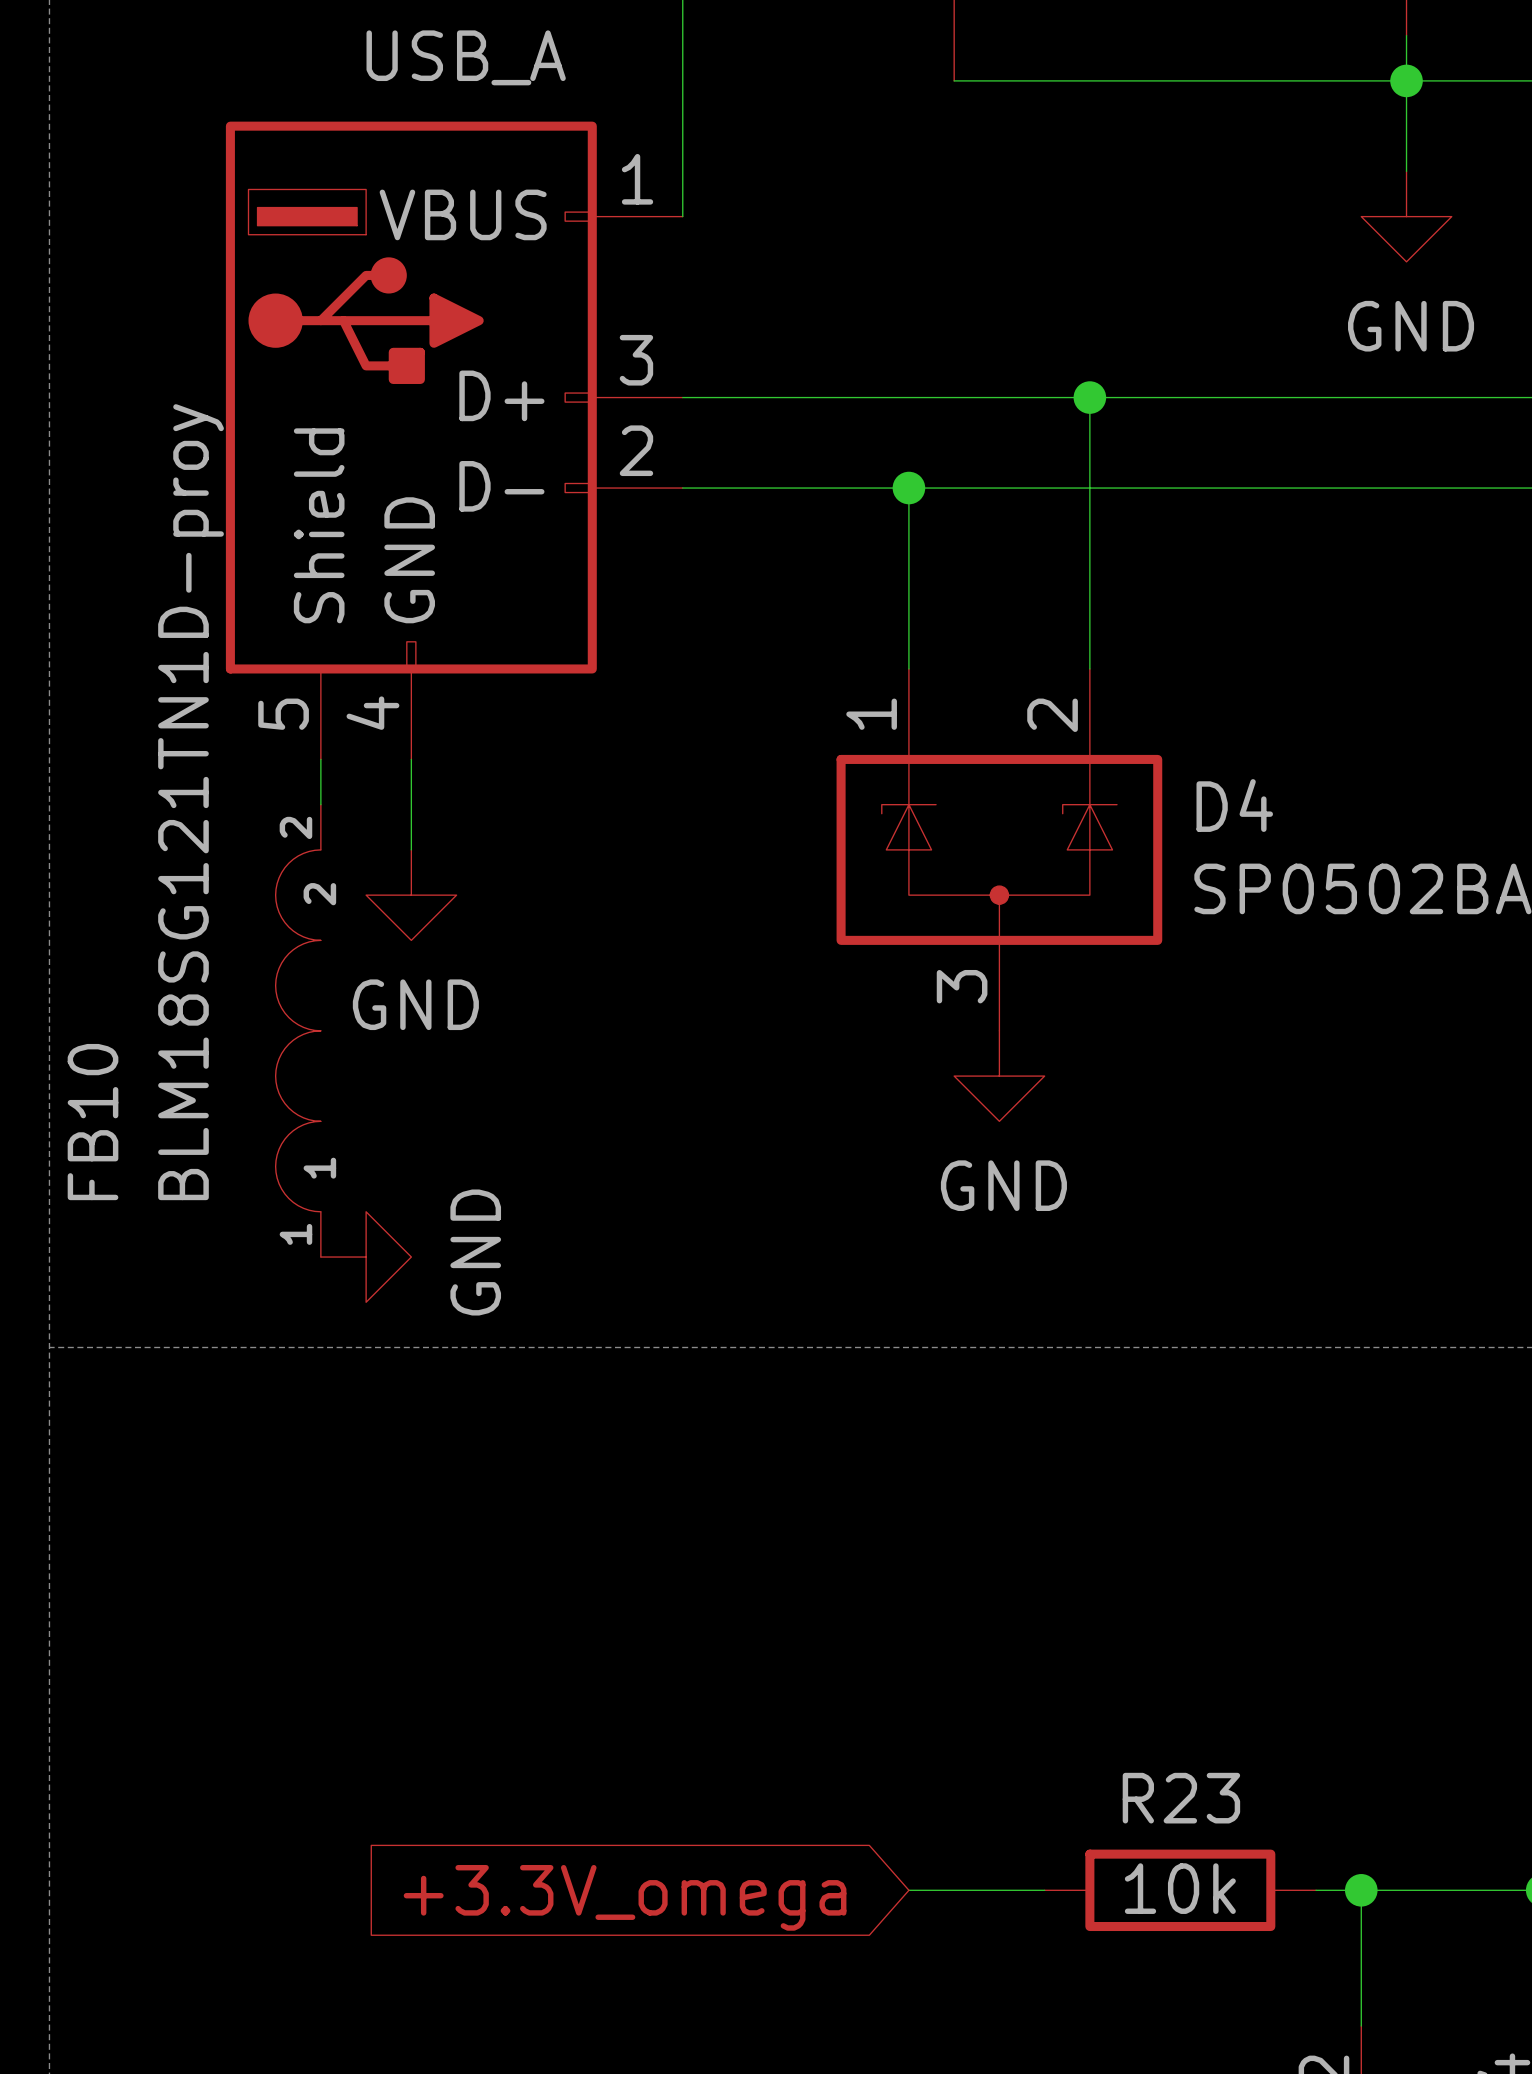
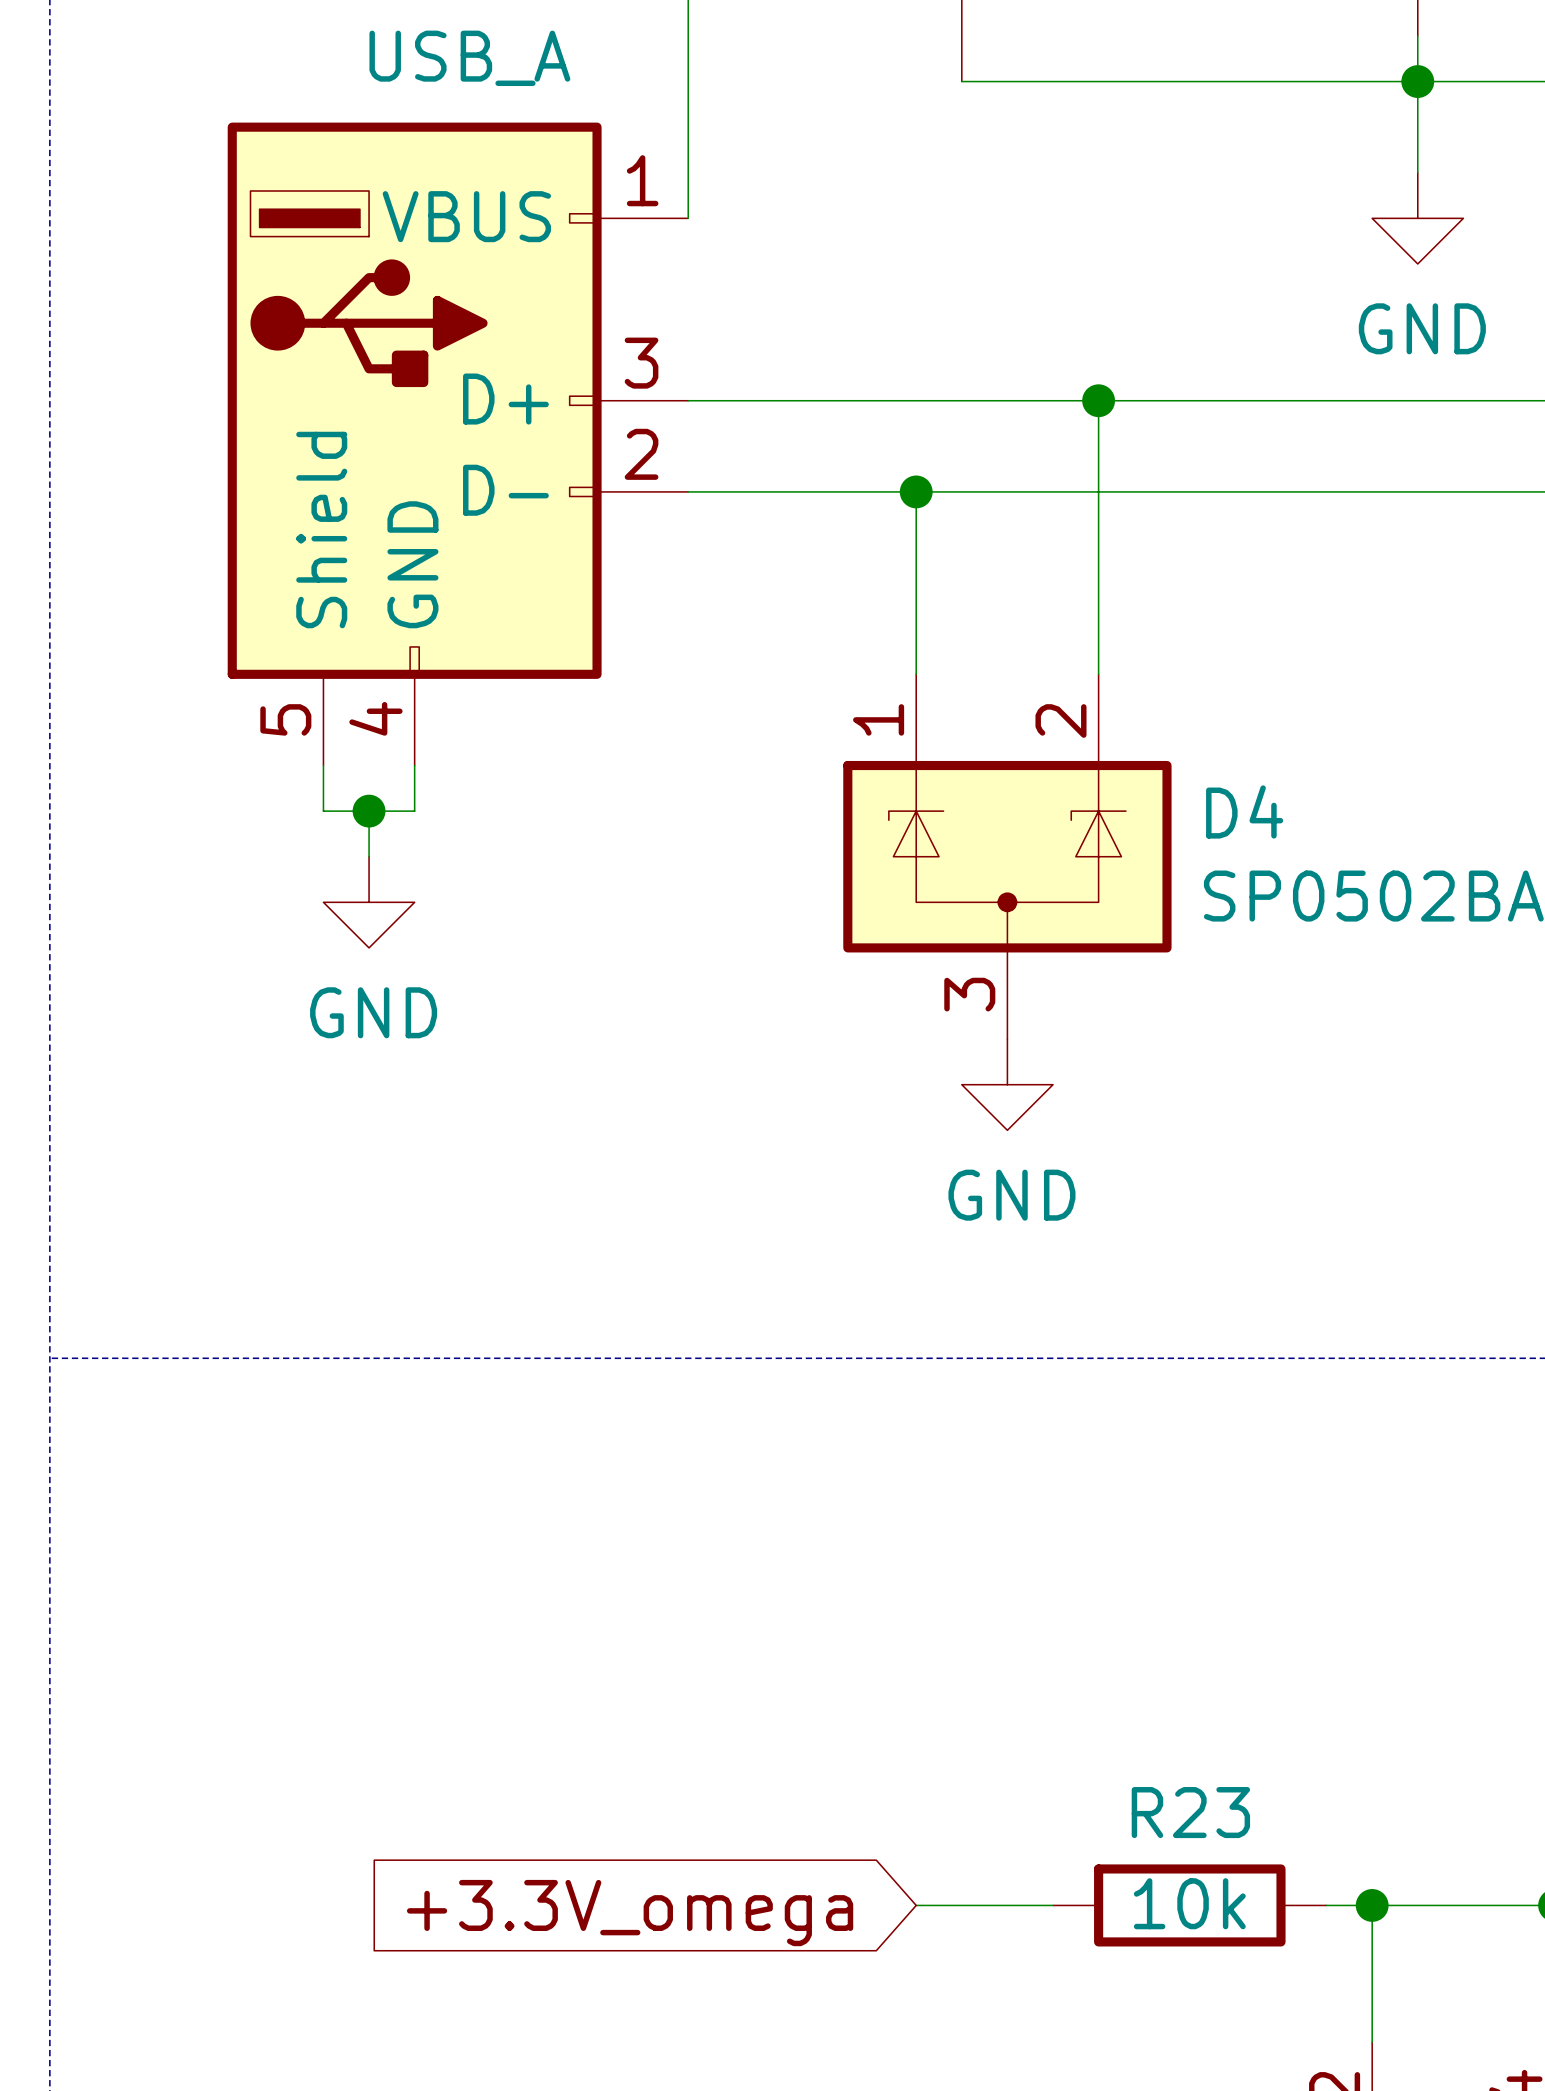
wire: none -> (369, 811) (369, 856)
junction: none -> (369, 811)
wire: (411, 804) (411, 849) -> (414, 811) (323, 811)
power symbol position: GND (411, 895) -> GND (369, 902)
FB10: BLM18SG121TN1D-proy (298, 1030) -> none
power symbol: GND (366, 1257) -> none

